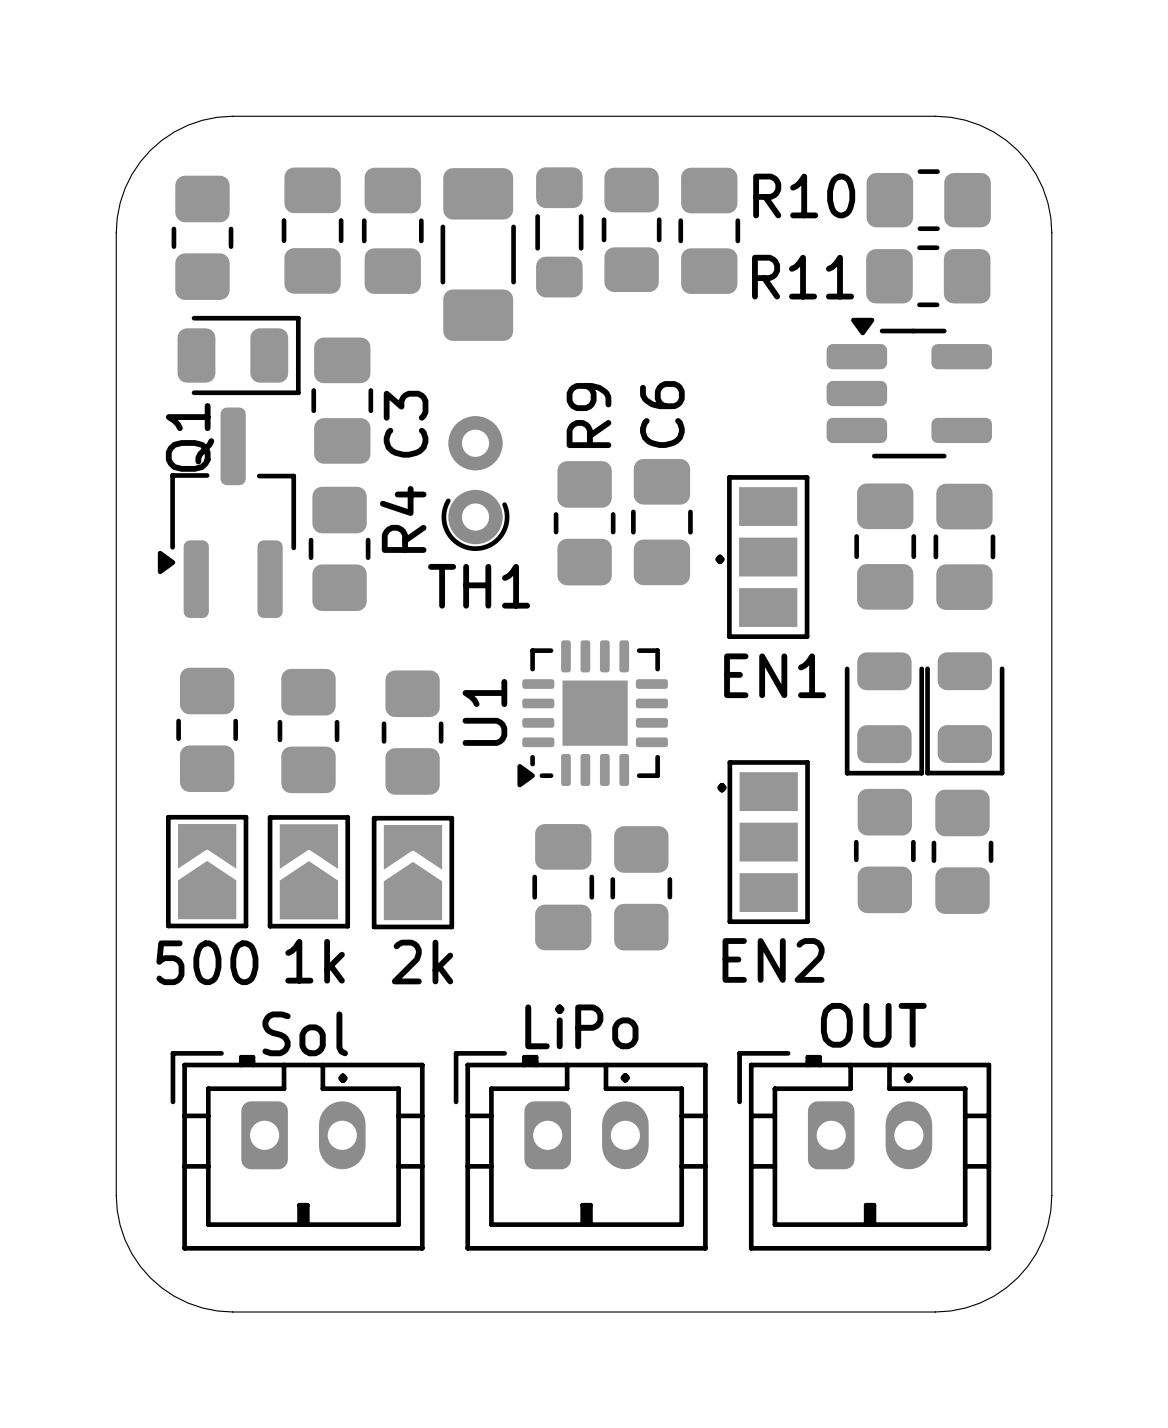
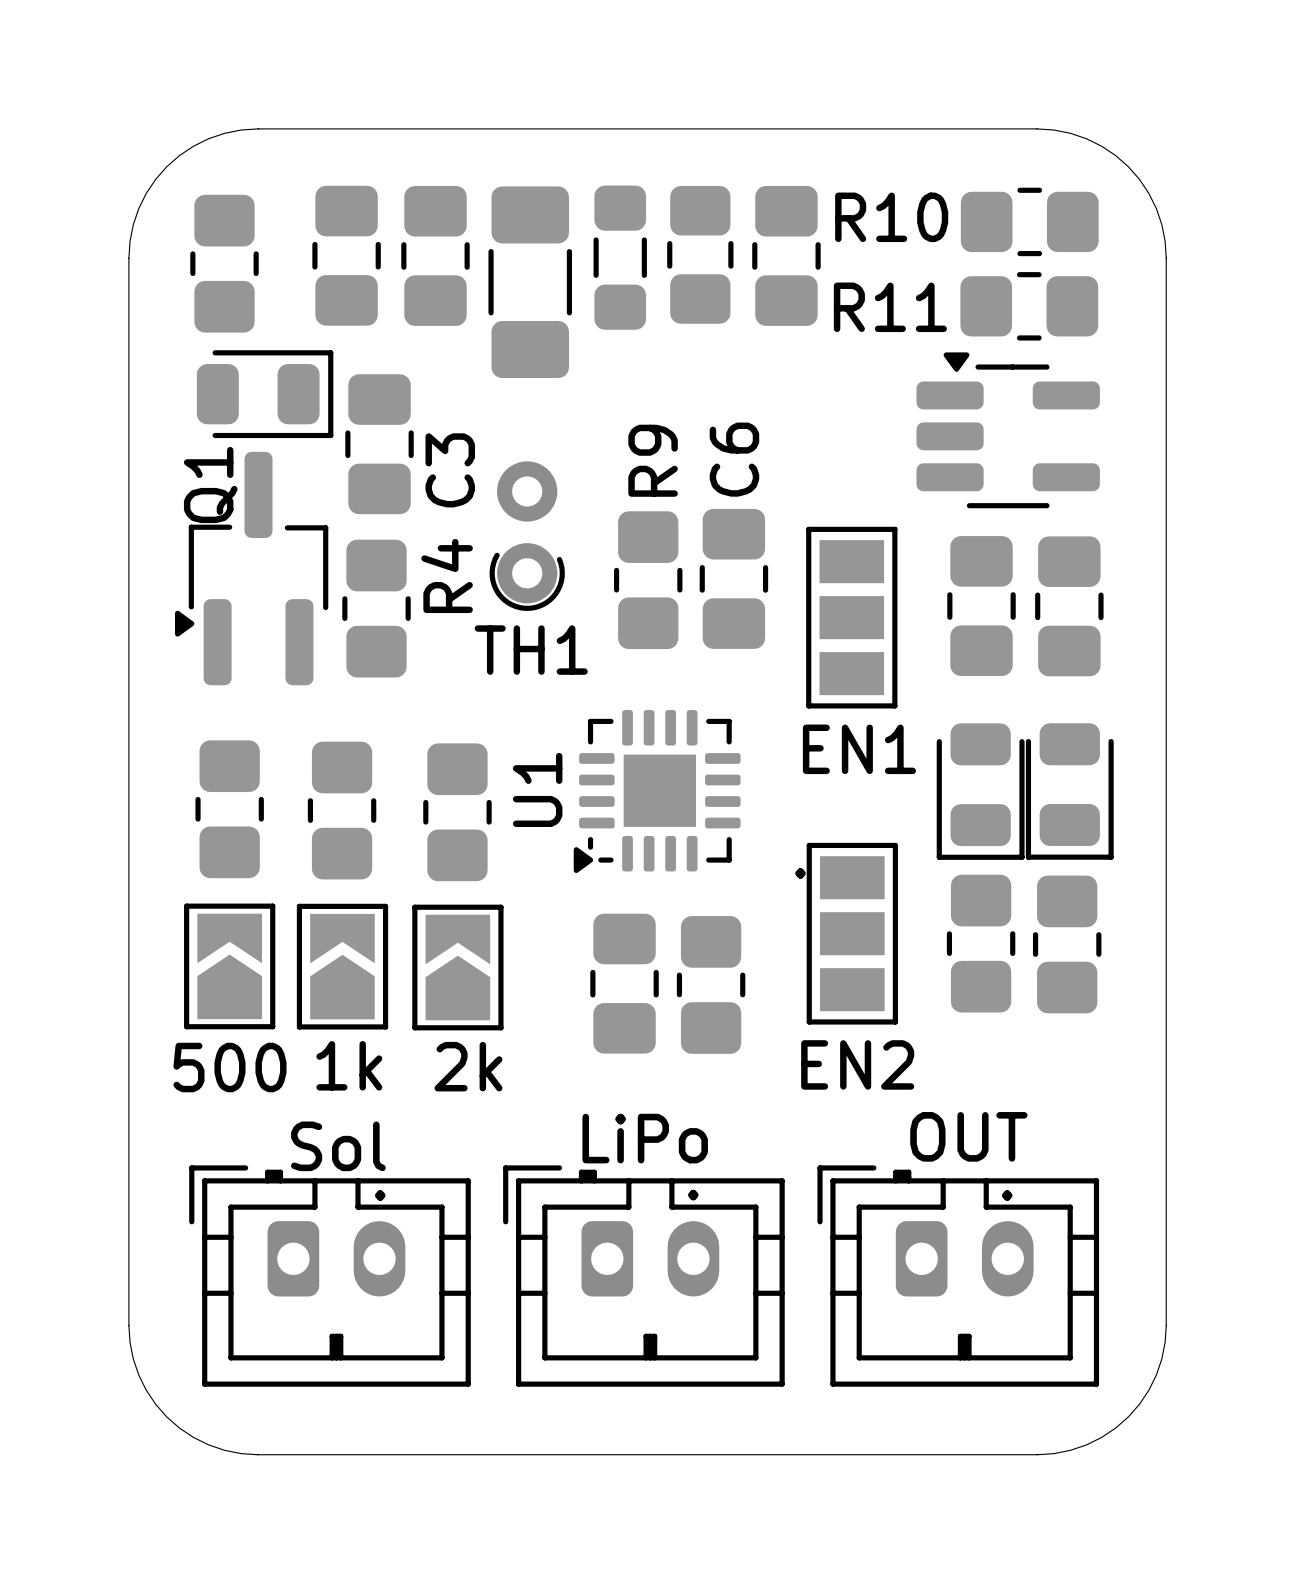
text: . (720, 559) -> none

